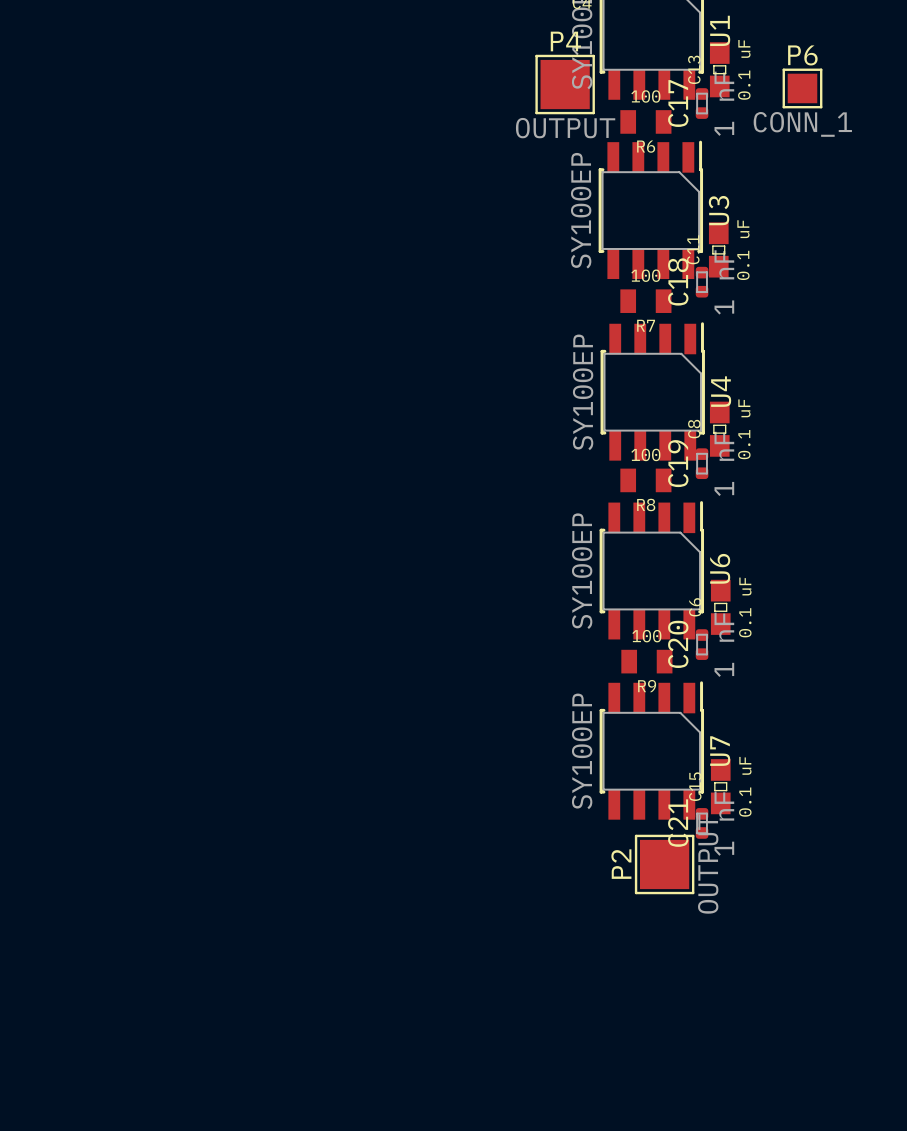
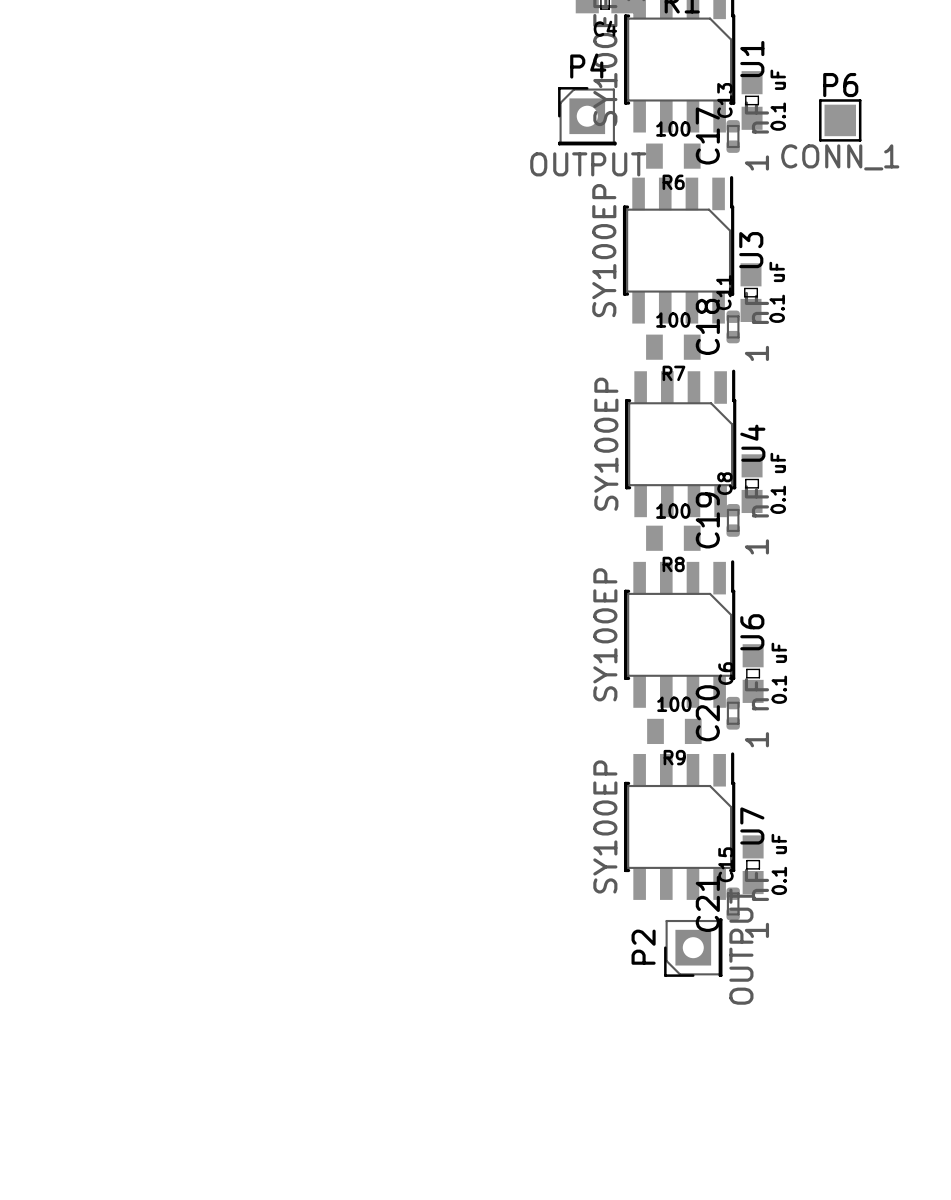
P4 footprint: [535, 54, 595, 115] -> [558, 87, 617, 146]
P2 footprint: [634, 834, 695, 895] -> [664, 918, 723, 977]

